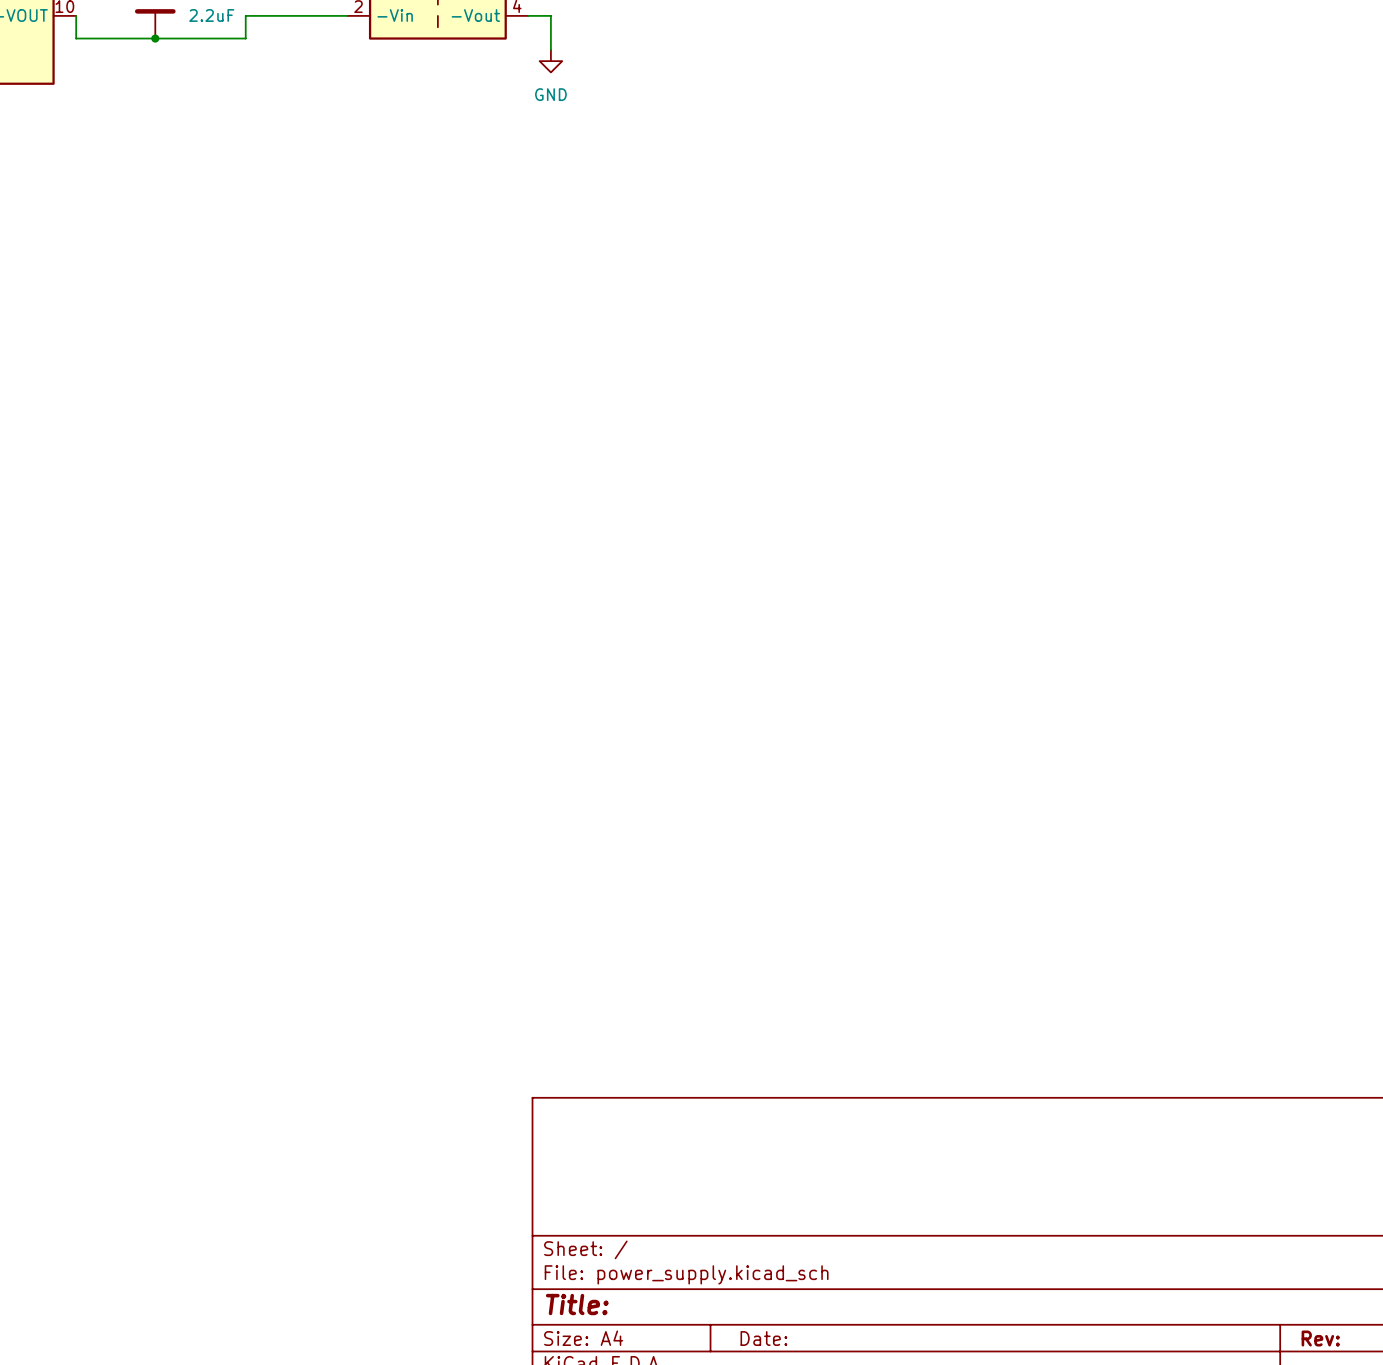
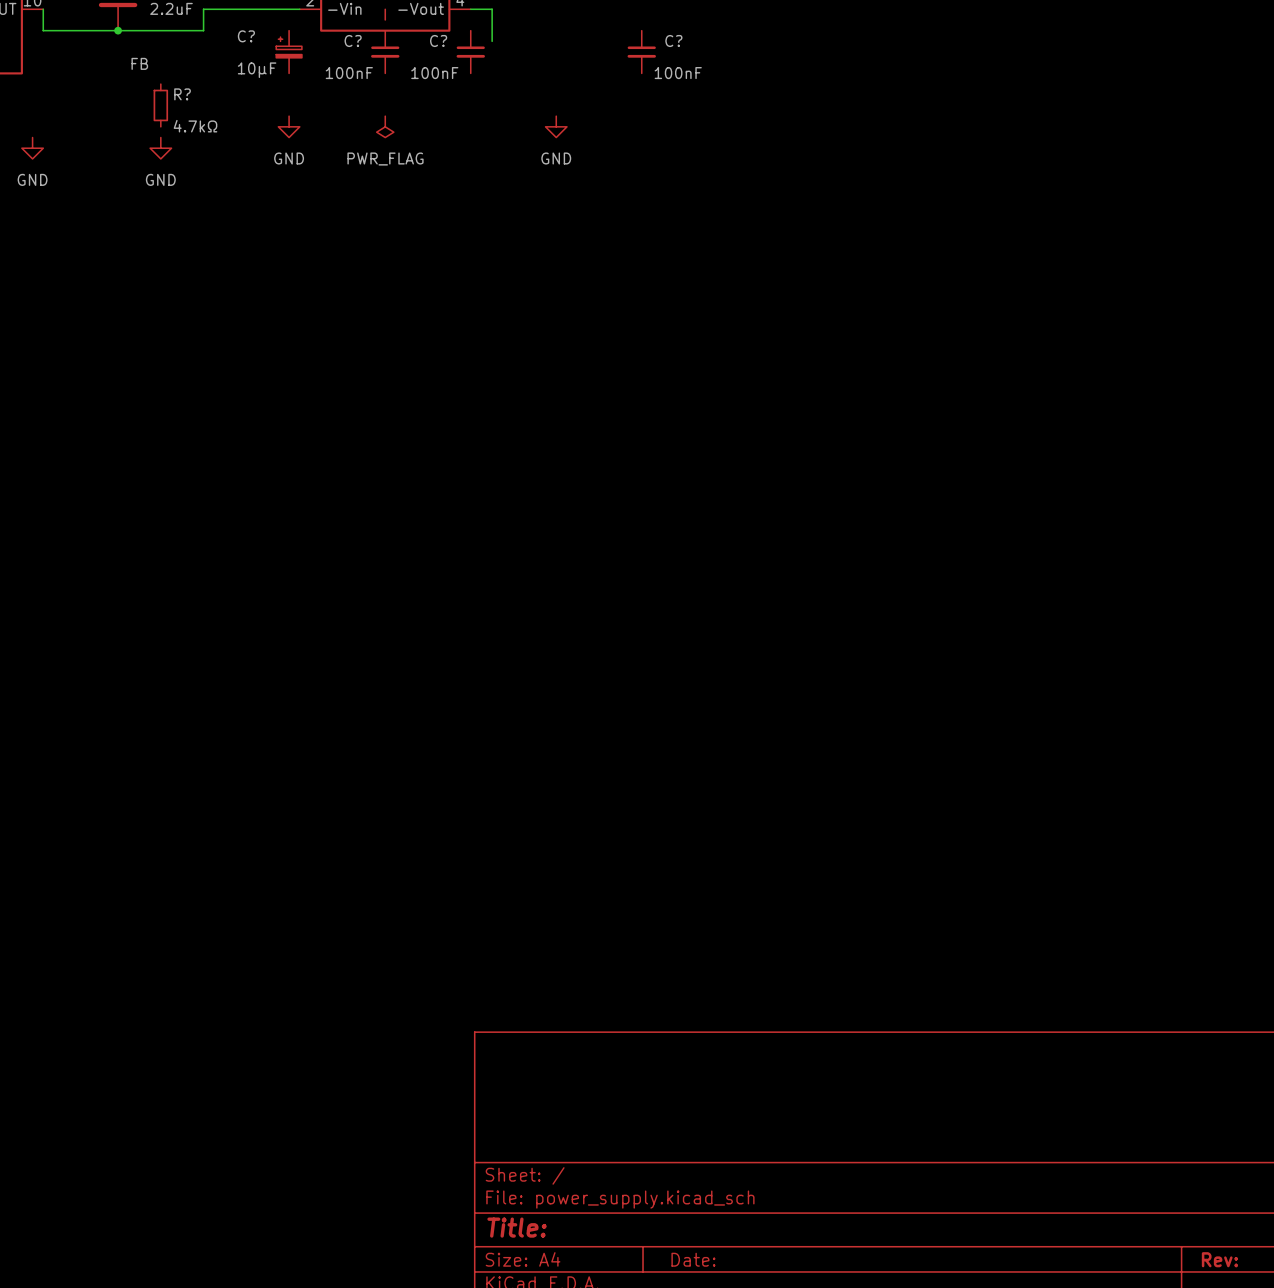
C?: none -> 10μF (289, 52)
C?: none -> 100nF (385, 52)
C?: none -> 100nF (470, 52)
power symbol position: GND (550, 61) -> GND (556, 126)
C?: none -> 100nF (641, 52)
label: none -> FB (139, 63)
R?: none -> 4.7kΩ (160, 105)
power symbol: none -> GND (289, 126)
power symbol: none -> PWR_FLAG (385, 126)
power symbol: none -> GND (32, 148)
power symbol: none -> GND (160, 148)

